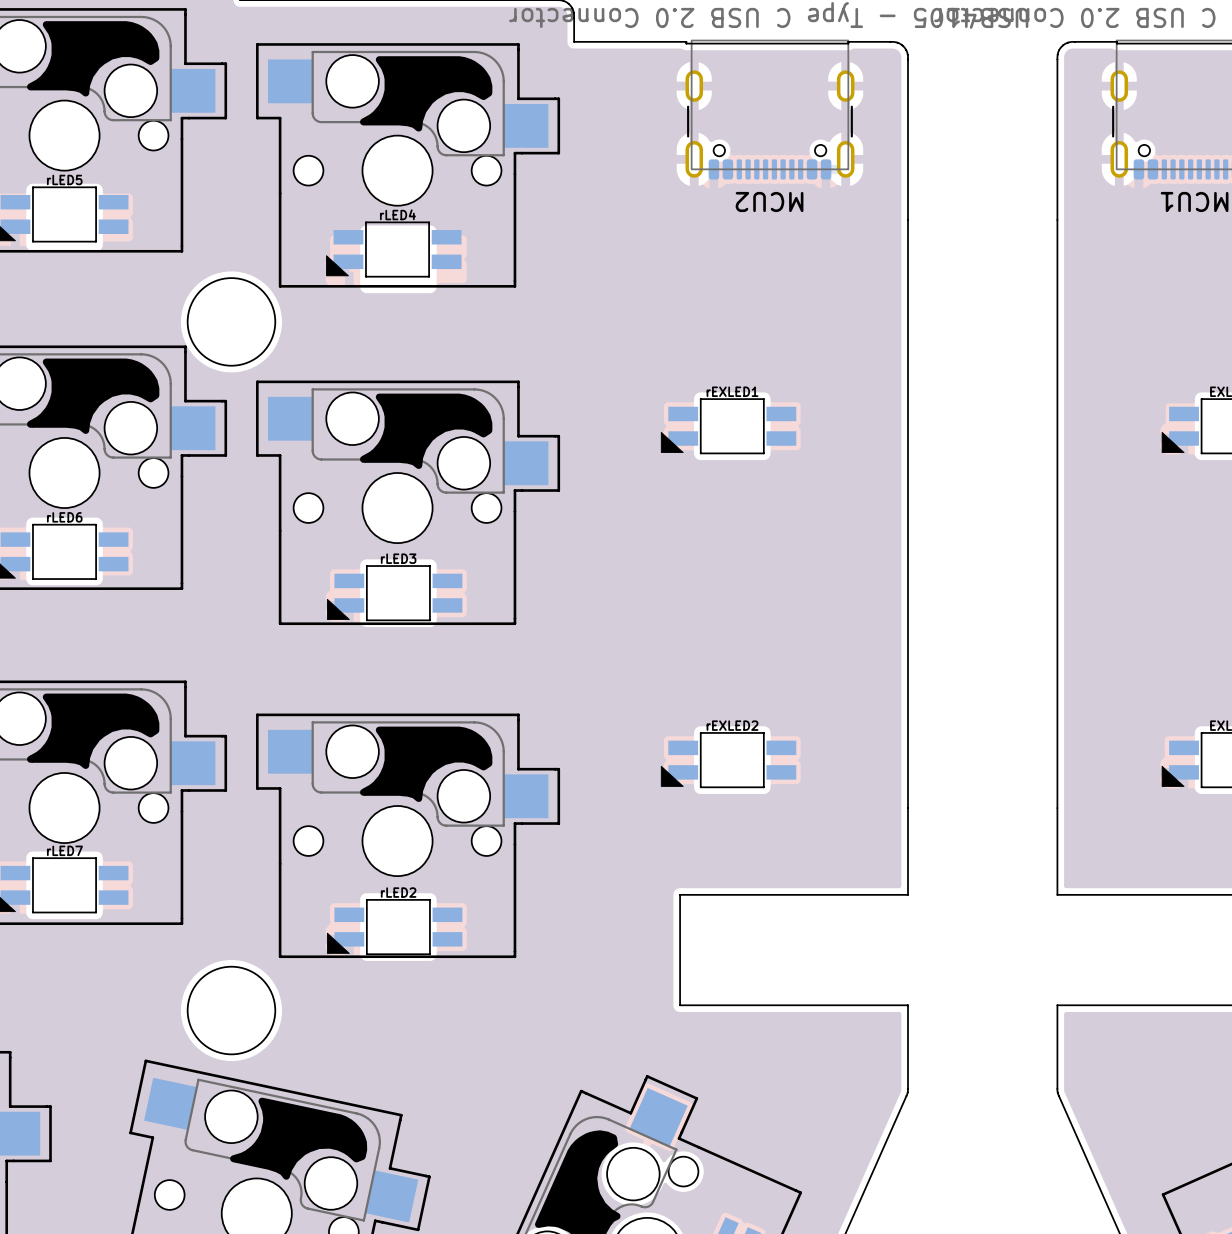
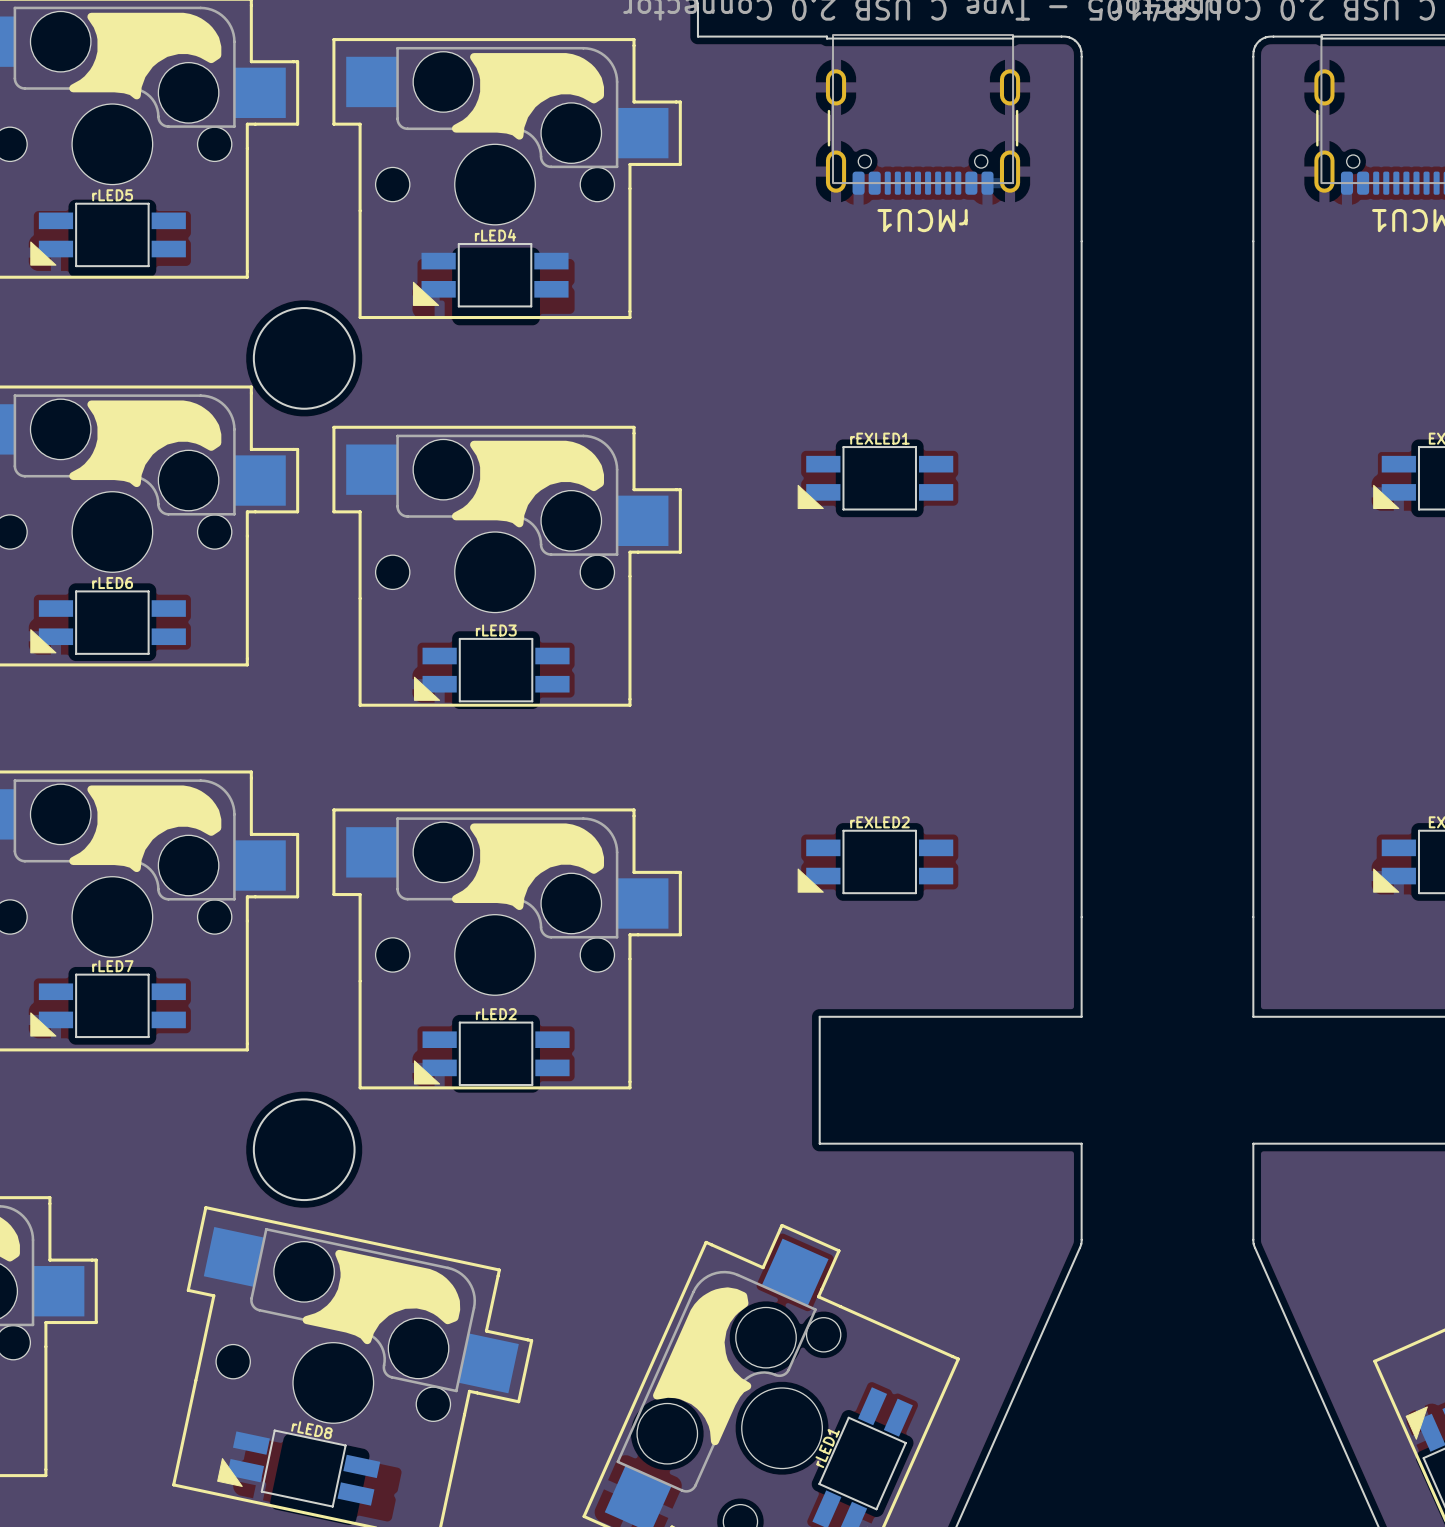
MCU2 name: MCU2 (769, 201) -> rMCU1 (922, 220)

